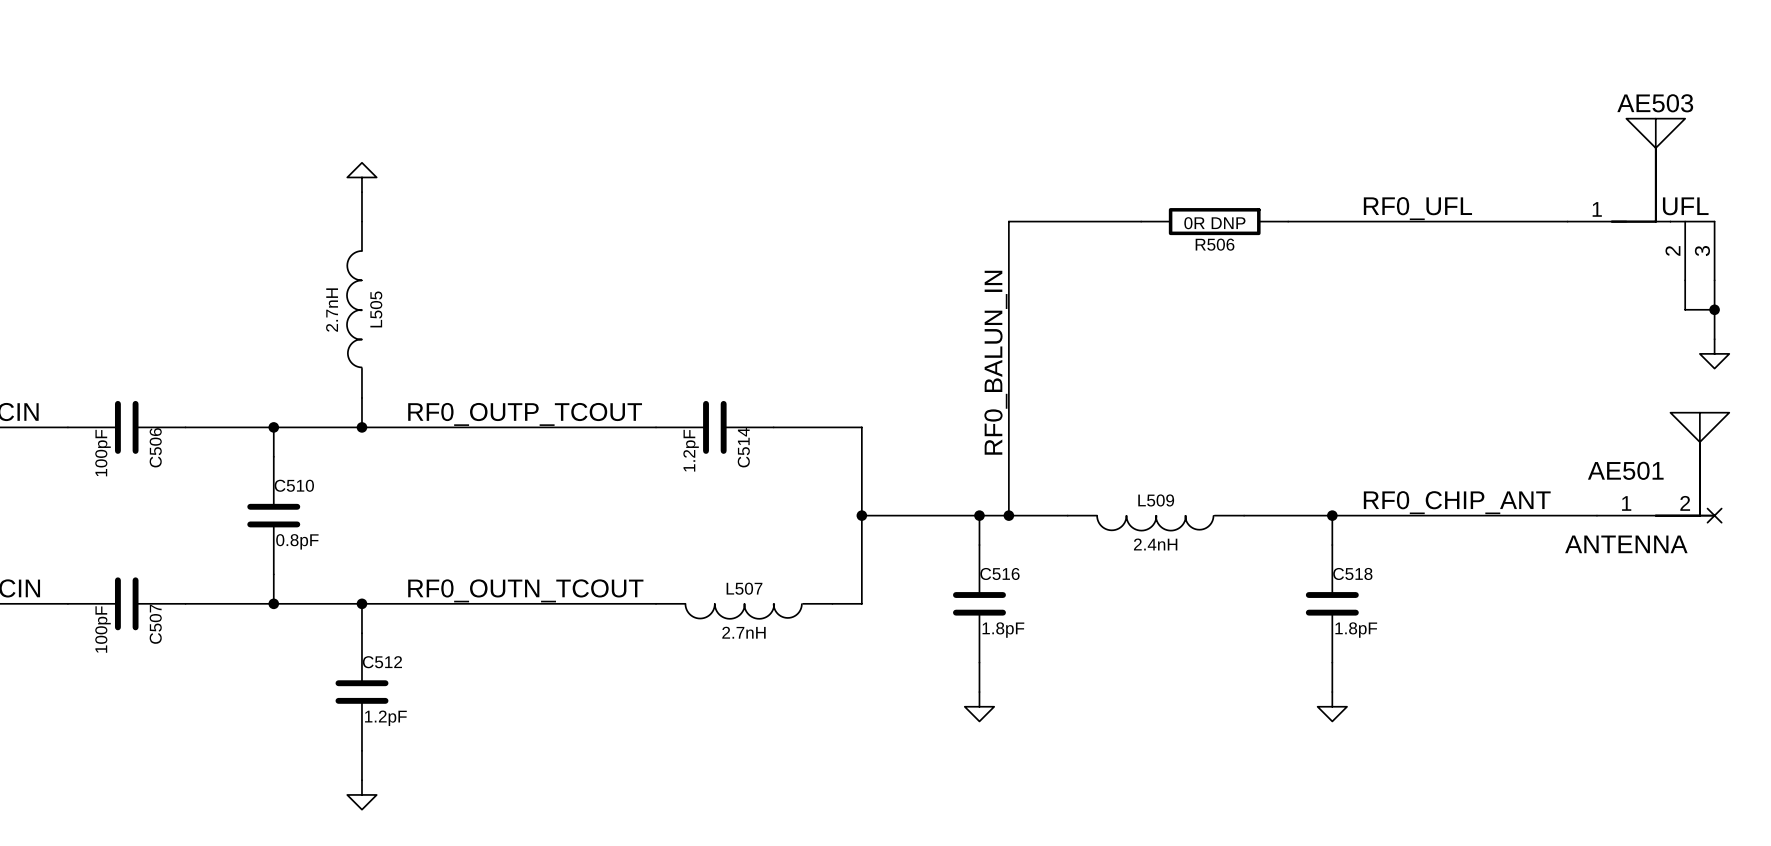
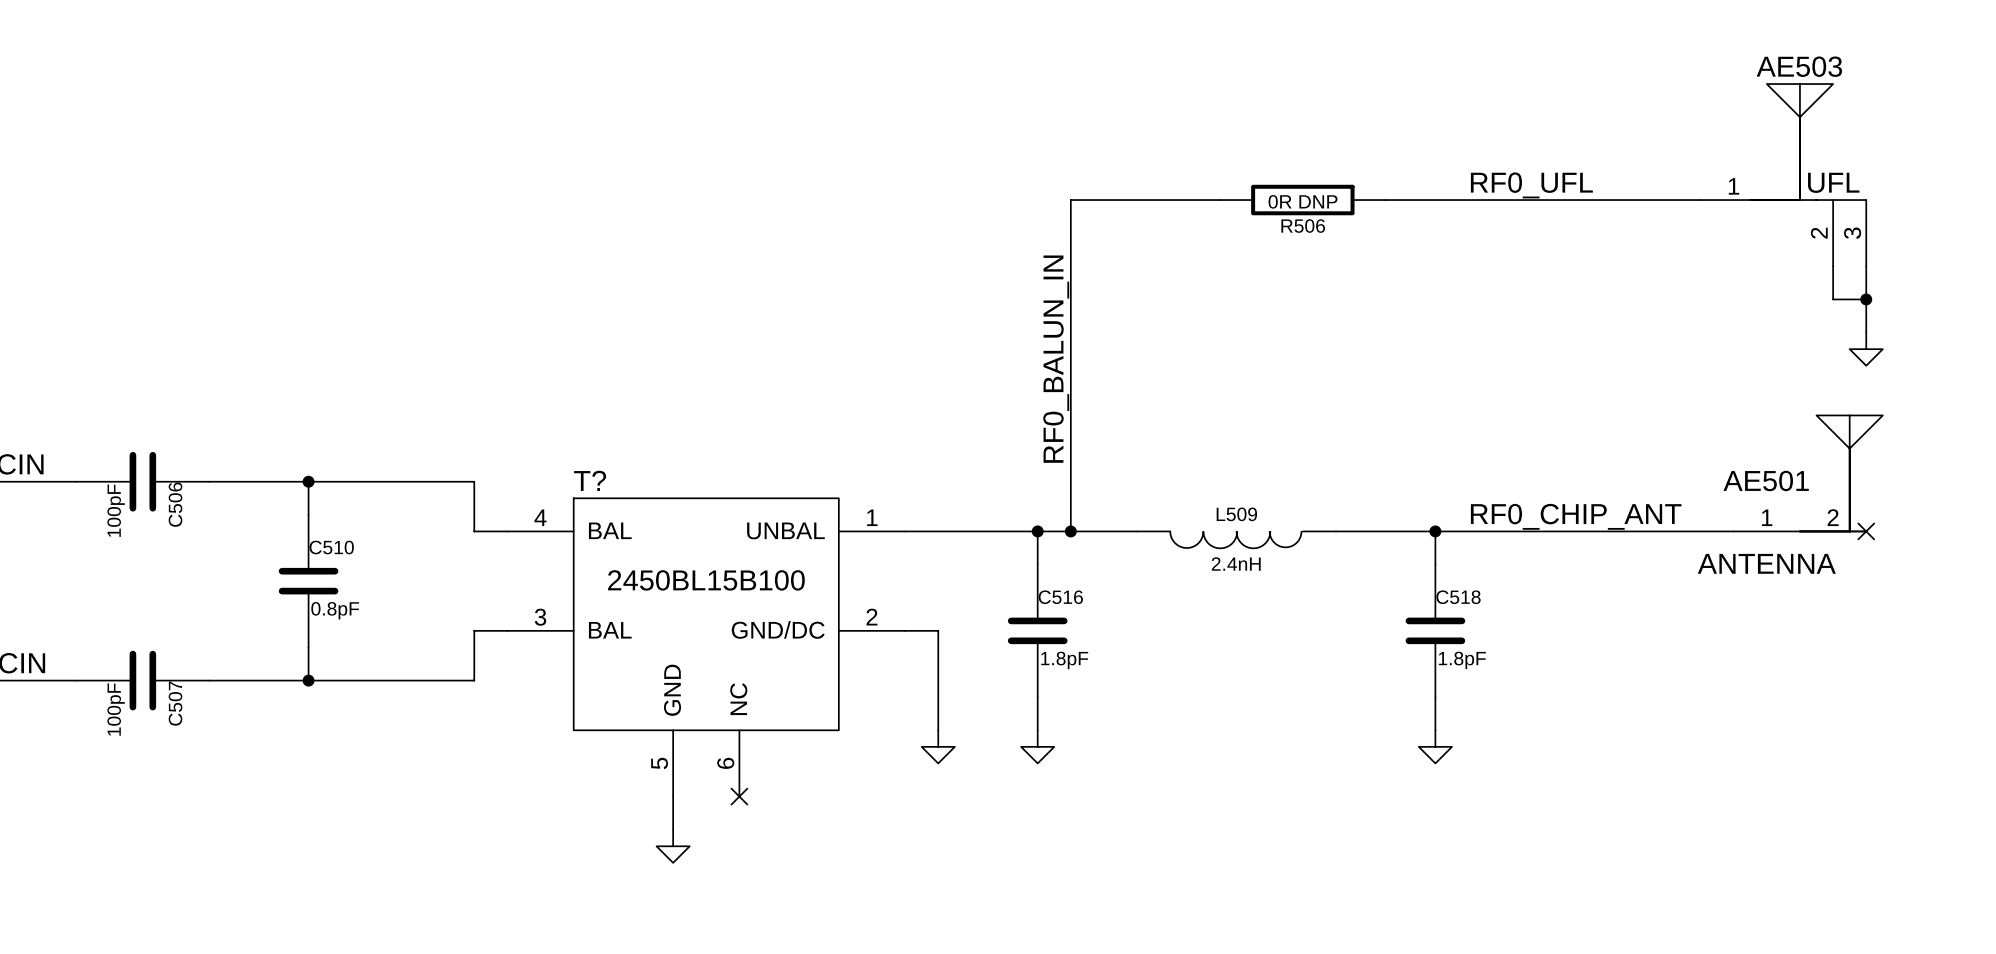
power symbol: (361, 177) -> none
wire: (361, 192) (361, 221) -> none
AE503 position: (1641, 199) -> (1783, 175)
label position: RF0_UFL (1417, 208) -> RF0_UFL (1531, 185)
wire: (1141, 221) (1008, 221) (1008, 515) -> (1219, 200) (1070, 200) (1070, 531)
R506 position: (1214, 221) -> (1302, 200)
wire: (1288, 221) (1567, 221) -> (1385, 200) (1700, 200)
junction: none -> (1866, 299)
wire: (1685, 280) (1685, 309) (1714, 309) -> (1833, 266) (1833, 299) (1866, 299)
wire: (1714, 280) (1714, 339) -> (1866, 266) (1866, 332)
L505: 2.7nH (354, 309) -> none
junction: (1714, 309) -> none
power symbol position: (1714, 353) -> (1866, 349)
label position: RF0_BALUN_IN (995, 362) -> RF0_BALUN_IN (1056, 359)
wire: (361, 398) (361, 427) -> none
label: RF0_OUTP_TCOUT (525, 414) -> none
junction: (361, 427) -> none
wire: (420, 427) (656, 427) -> (474, 481) (474, 531) (507, 531)
C514: 1.2pF (714, 427) -> none
wire: (773, 427) (861, 427) (861, 603) (832, 603) -> none
AE501 position: (1663, 464) -> (1808, 473)
junction: none -> (1037, 531)
junction: none -> (1070, 531)
junction: none -> (1435, 531)
no-connect mark: none -> (1866, 531)
label position: RF0_CHIP_ANT (1457, 502) -> RF0_CHIP_ANT (1576, 516)
wire: (861, 515) (1067, 515) -> (905, 531) (1137, 531)
junction: (861, 515) -> none
wire: (979, 515) (979, 545) -> (1037, 531) (1037, 564)
junction: (979, 515) -> none
junction: (1008, 515) -> none
wire: (1244, 515) (1596, 515) -> (1335, 531) (1733, 531)
wire: (1332, 515) (1332, 545) -> (1435, 531) (1435, 564)
junction: (1332, 515) -> none
no-connect mark: (1714, 515) -> none
L509 position: (1155, 523) -> (1236, 539)
wire: none -> (905, 630) (938, 630) (938, 730)
T?: none -> 2450BL15B100 (706, 647)
label: RF0_OUTN_TCOUT (525, 590) -> none
wire: (361, 603) (361, 633) -> none
junction: (361, 603) -> none
wire: (420, 603) (656, 603) -> (474, 680) (474, 630) (507, 630)
C516 position: (979, 603) -> (1037, 630)
C518 position: (1332, 603) -> (1435, 630)
L507: 2.7nH (744, 611) -> none
power symbol: none -> (938, 746)
wire: (979, 662) (979, 692) -> (1037, 697) (1037, 730)
wire: (1332, 662) (1332, 692) -> (1435, 697) (1435, 730)
C512: 1.2pF (361, 692) -> none
no-connect mark: none -> (739, 796)
power symbol position: (979, 706) -> (1037, 746)
power symbol position: (1332, 706) -> (1435, 746)
wire: (361, 750) (361, 780) -> (673, 796) (673, 829)
power symbol: none -> (673, 846)
power symbol: (361, 794) -> none

